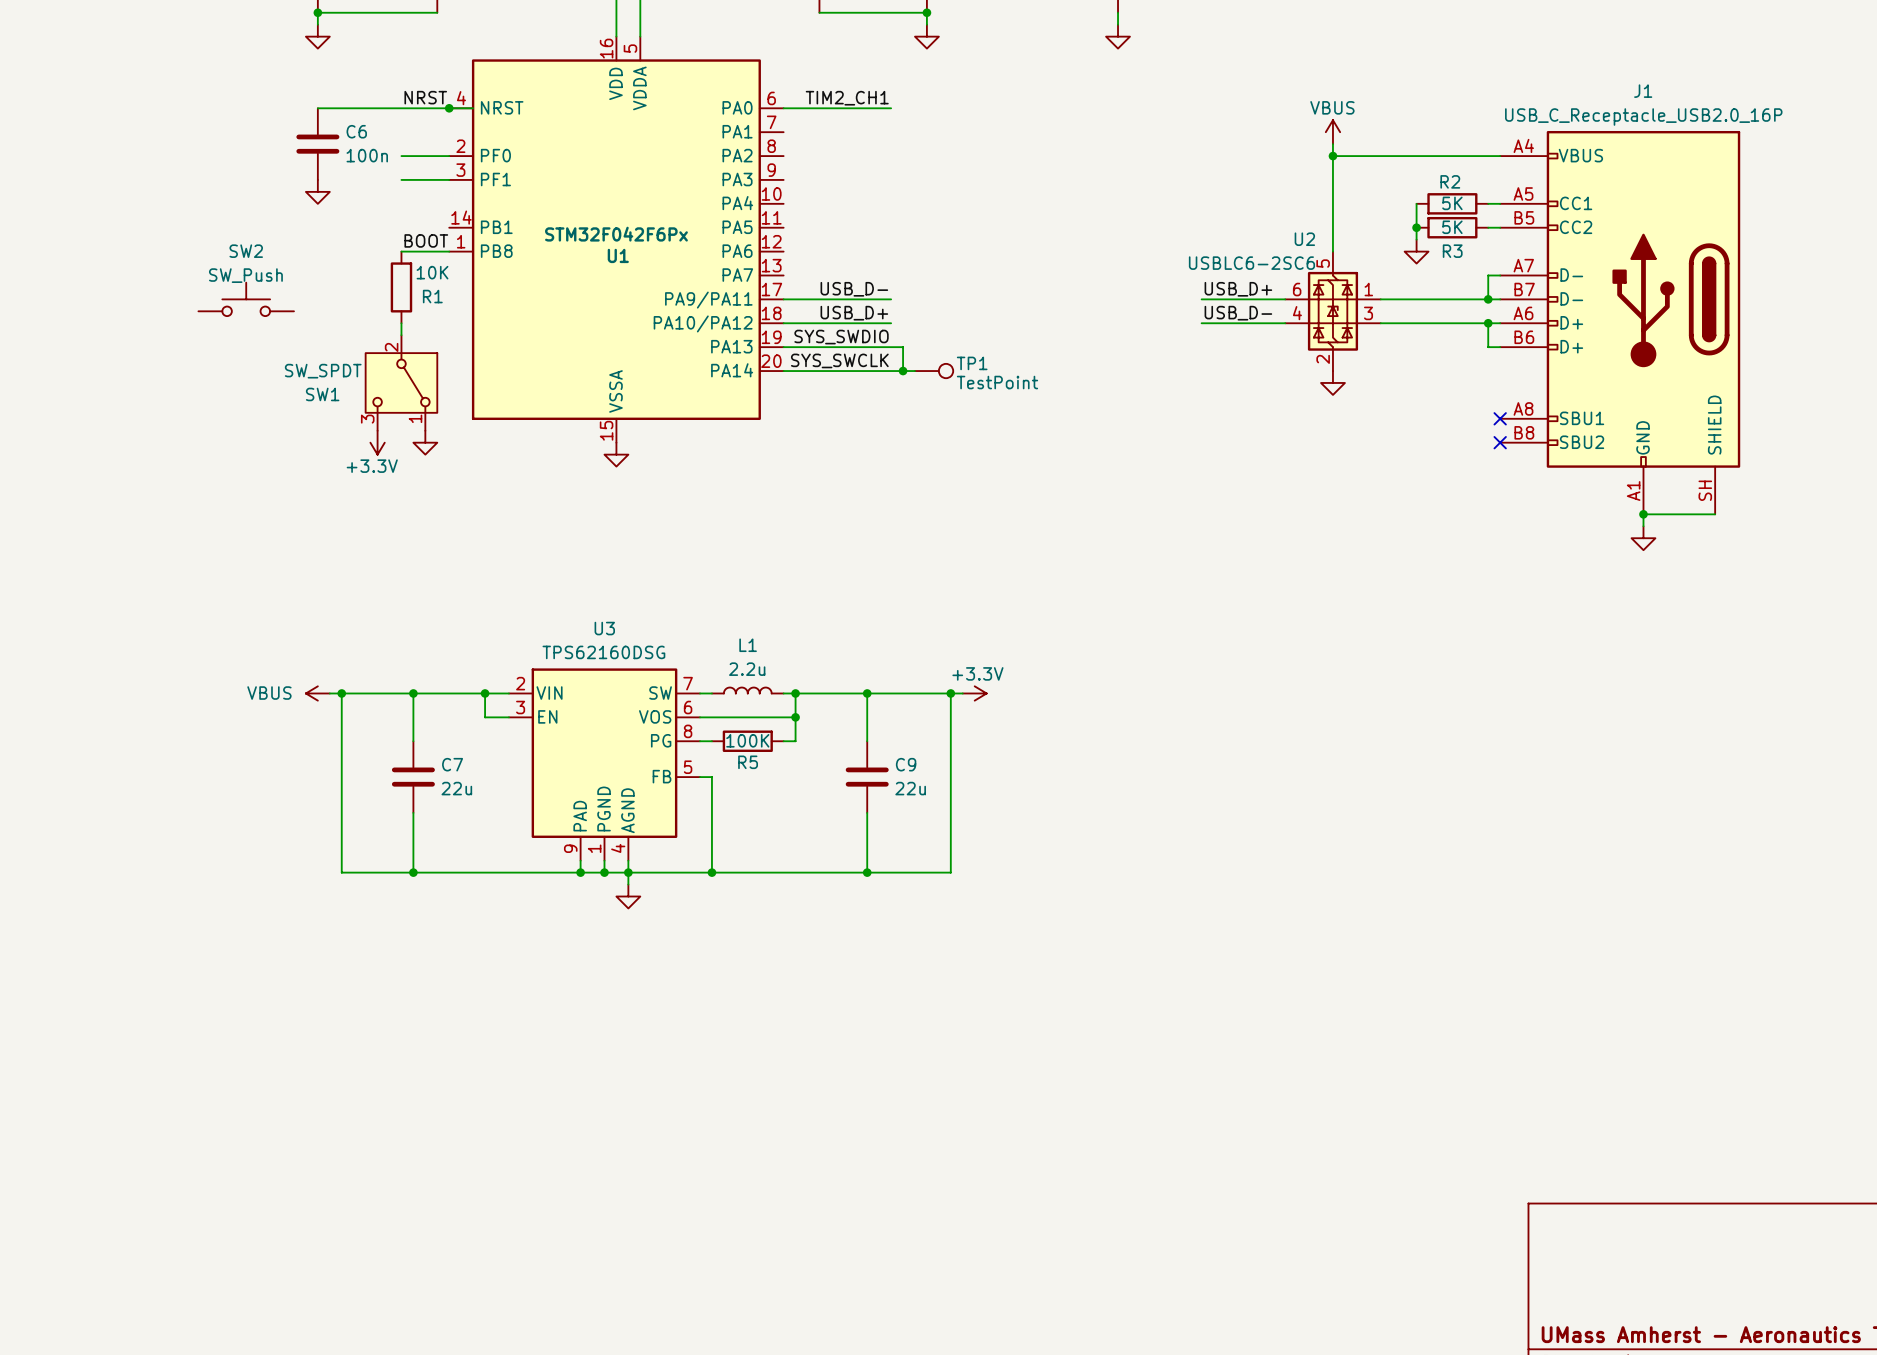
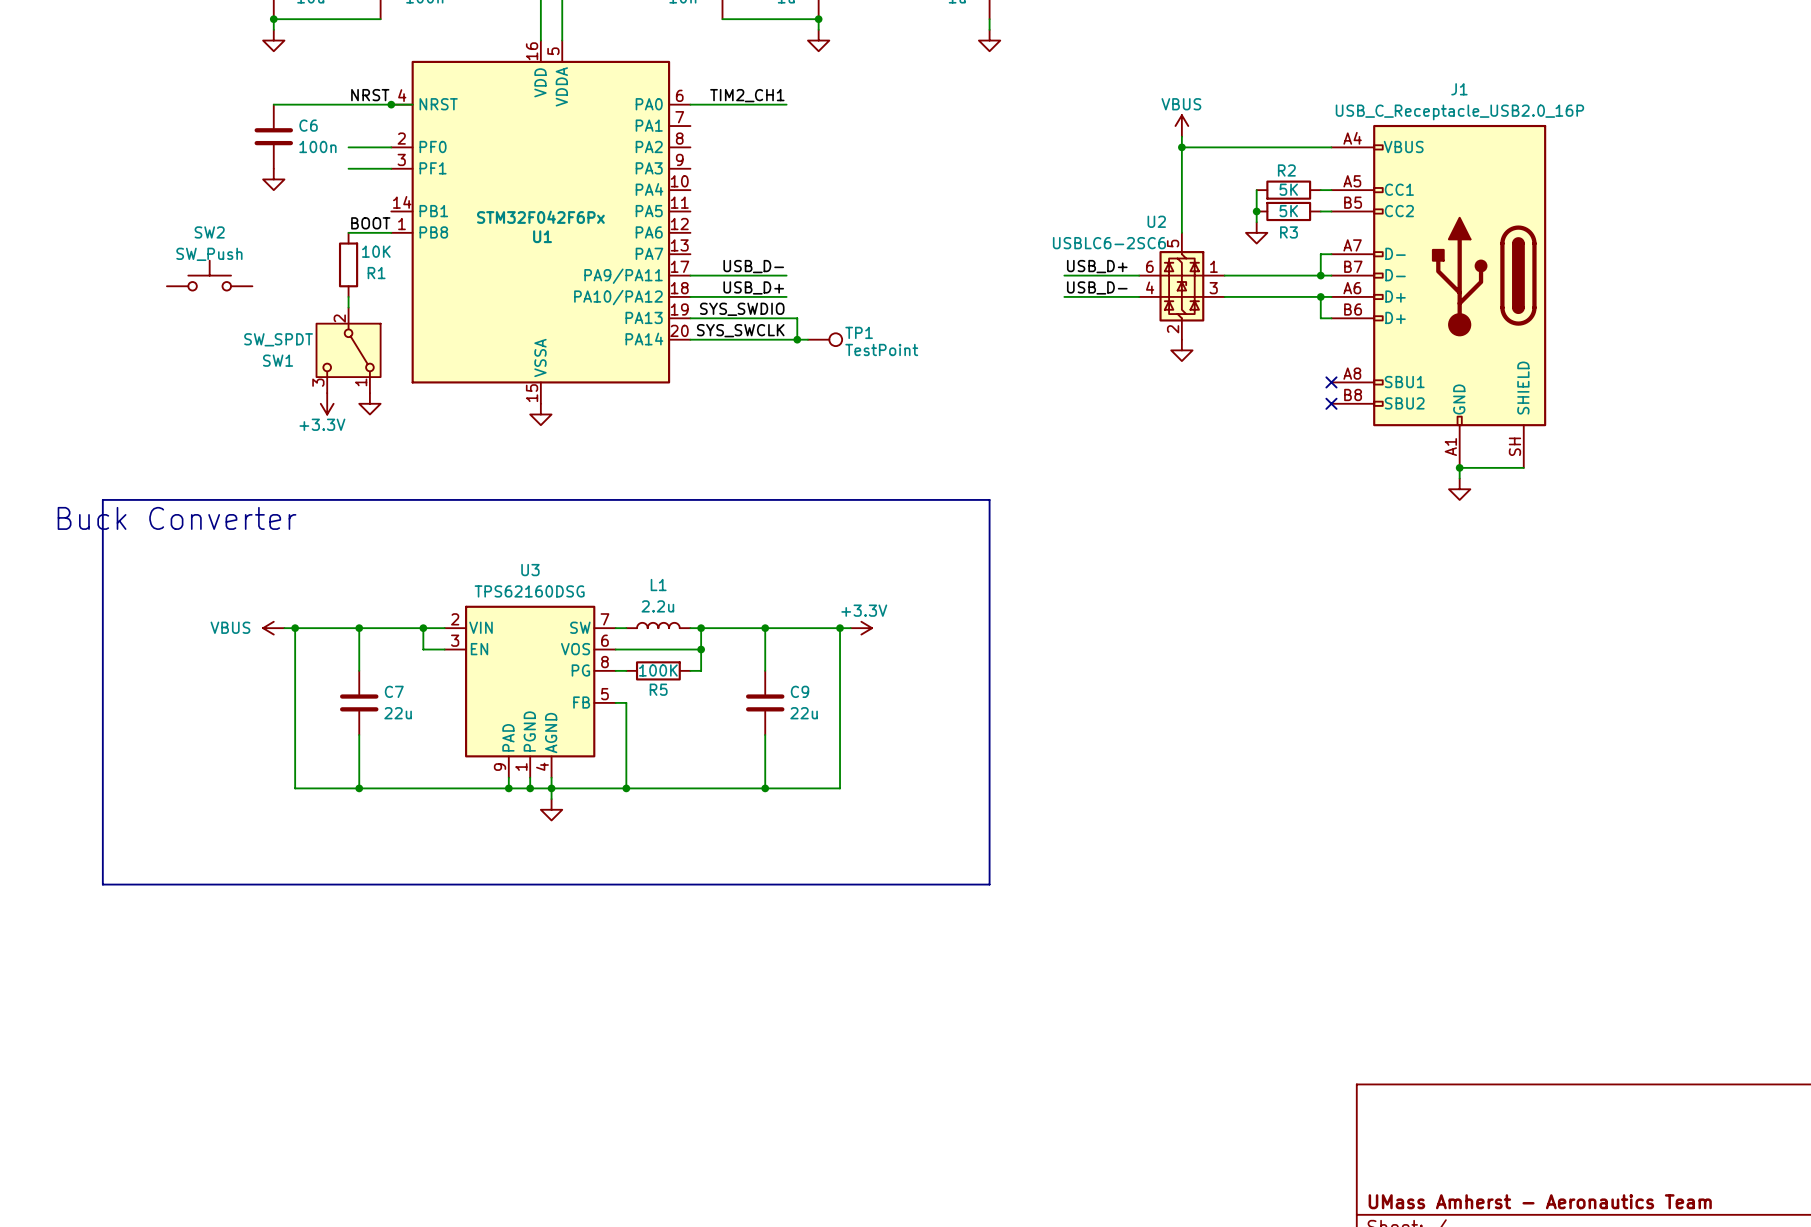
line: none -> (102, 499) (989, 499) (989, 884) (102, 884) (102, 499)
text: none -> Buck Converter (177, 518)

